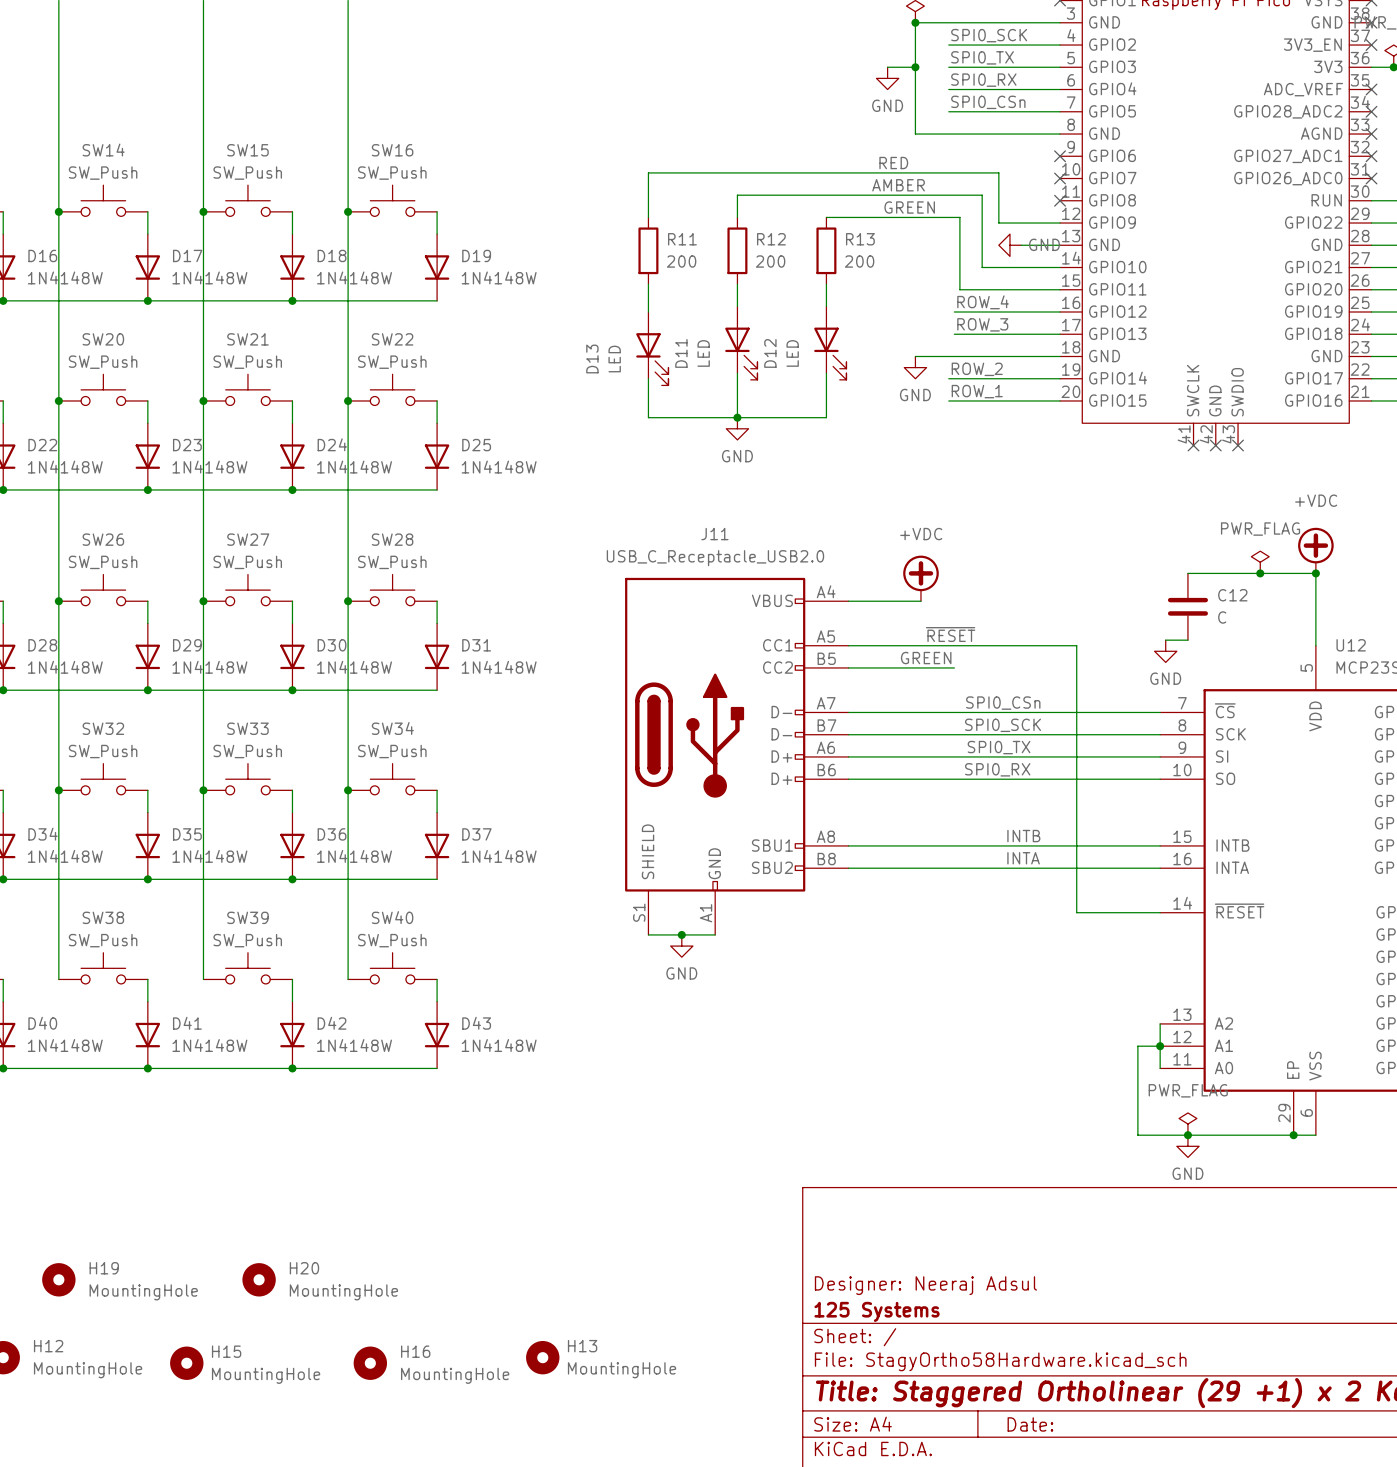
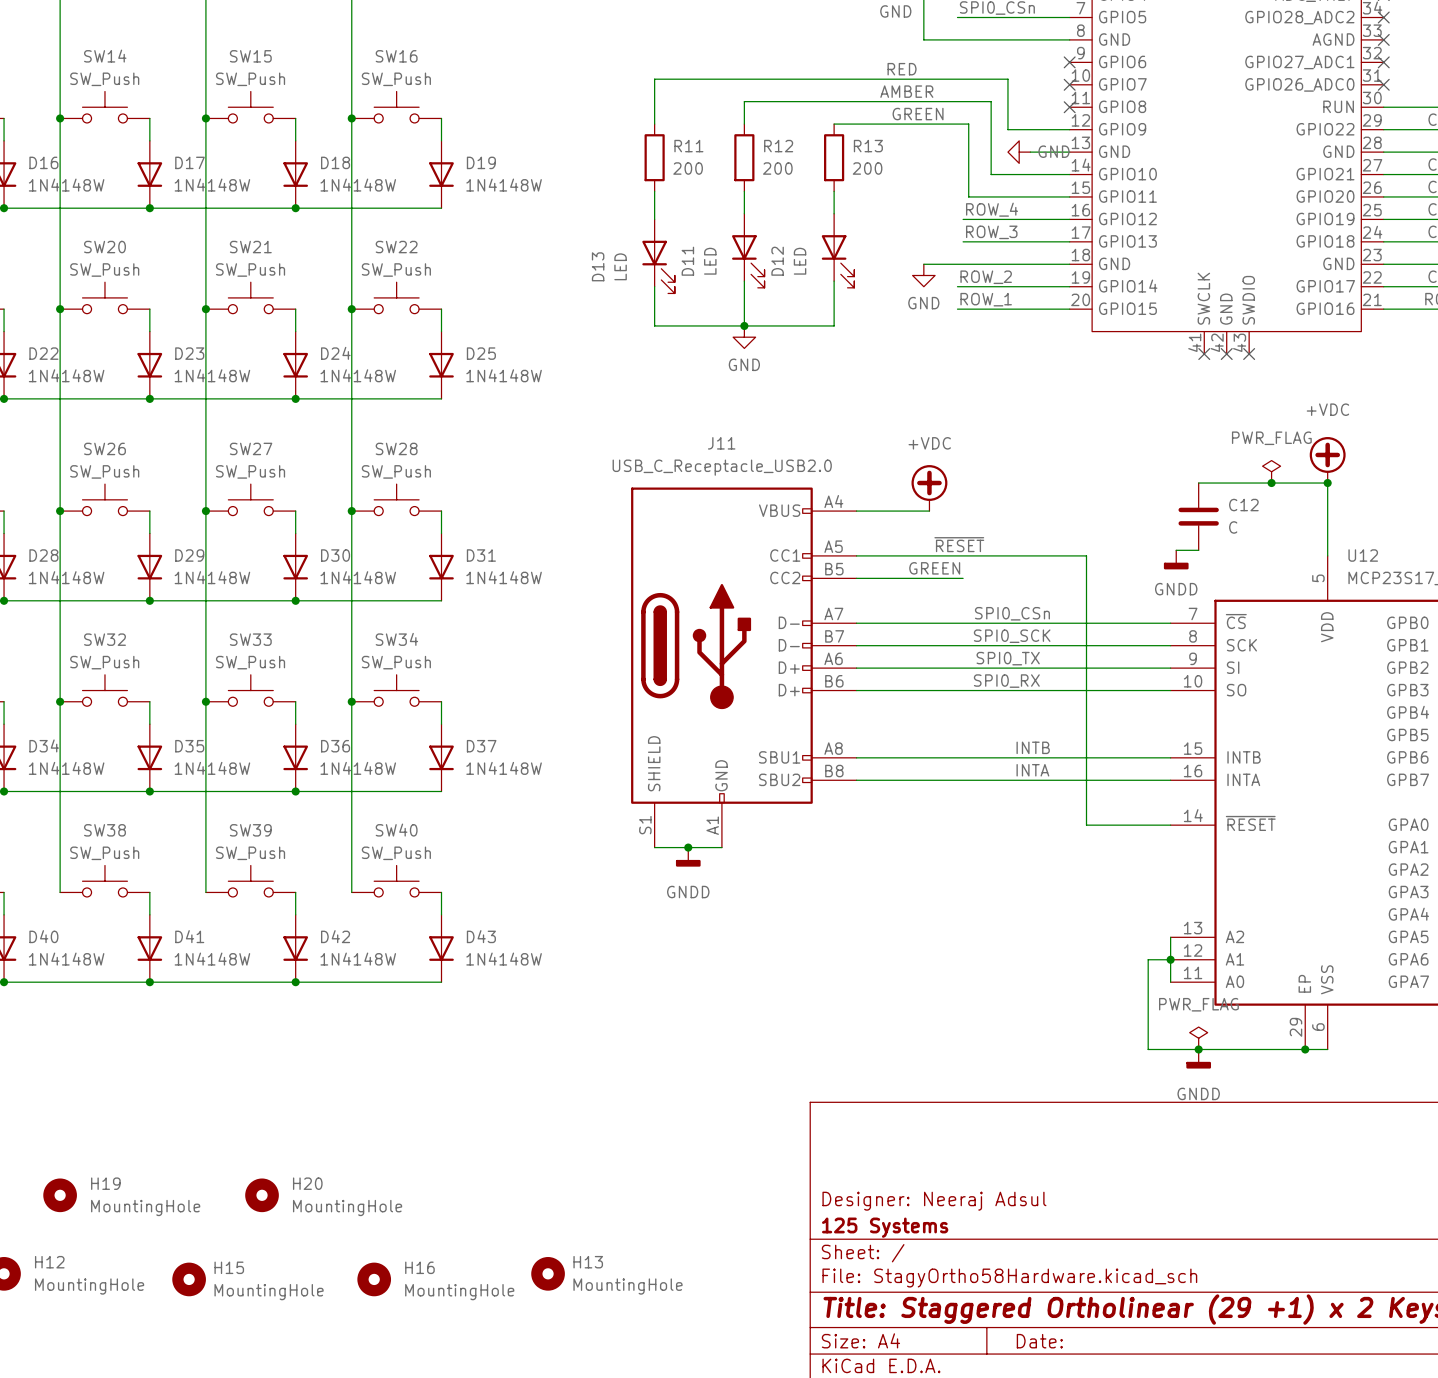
power symbol: GND (1165, 651) -> GNDD (1176, 559)
power symbol: GND (681, 946) -> GNDD (688, 857)
power symbol: GND (1187, 1146) -> GNDD (1198, 1059)

